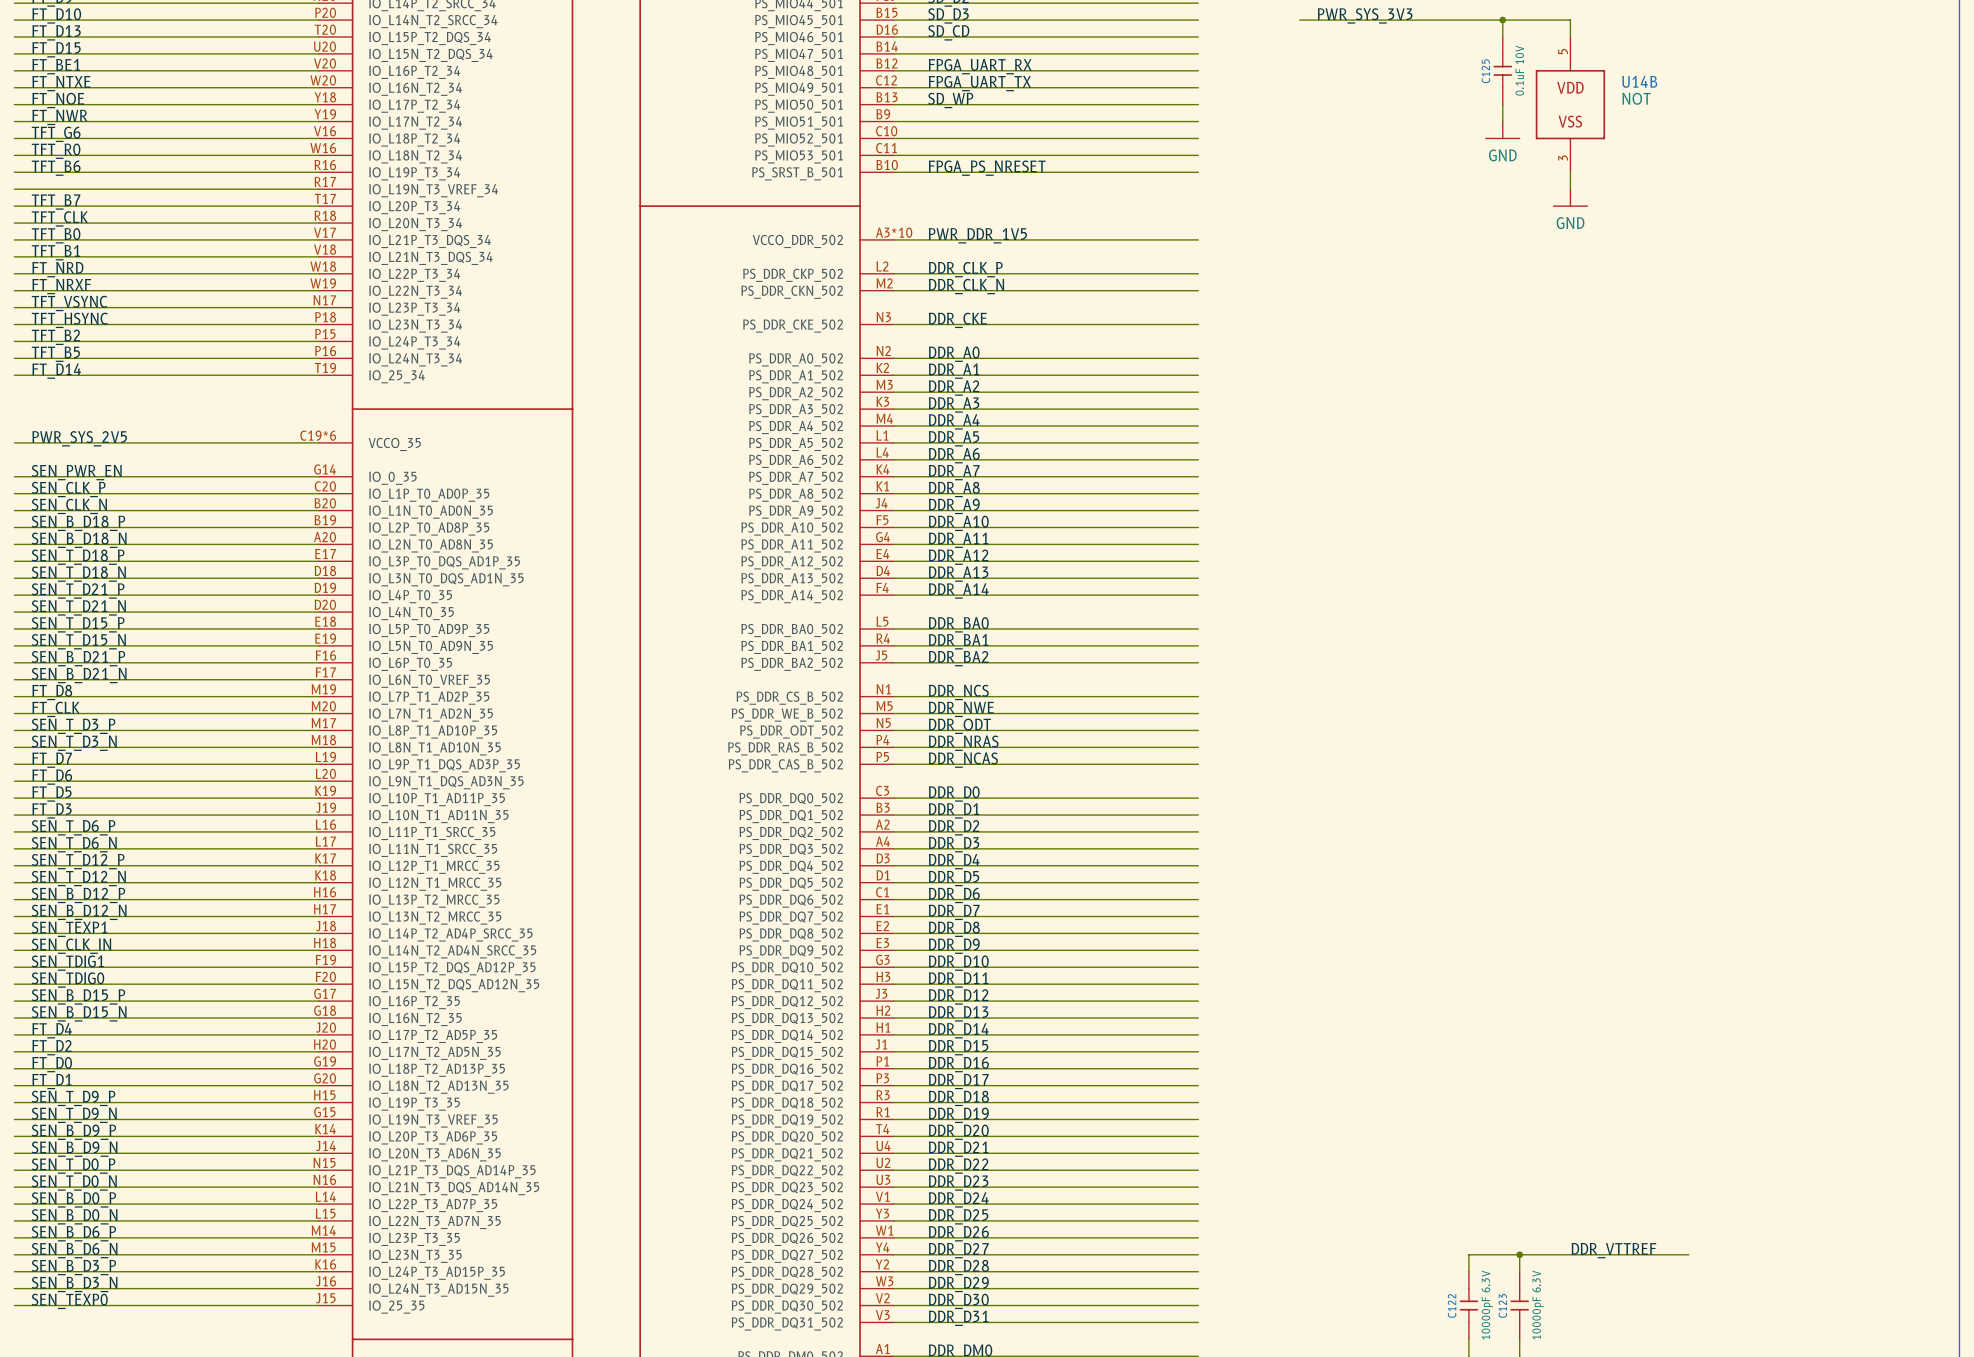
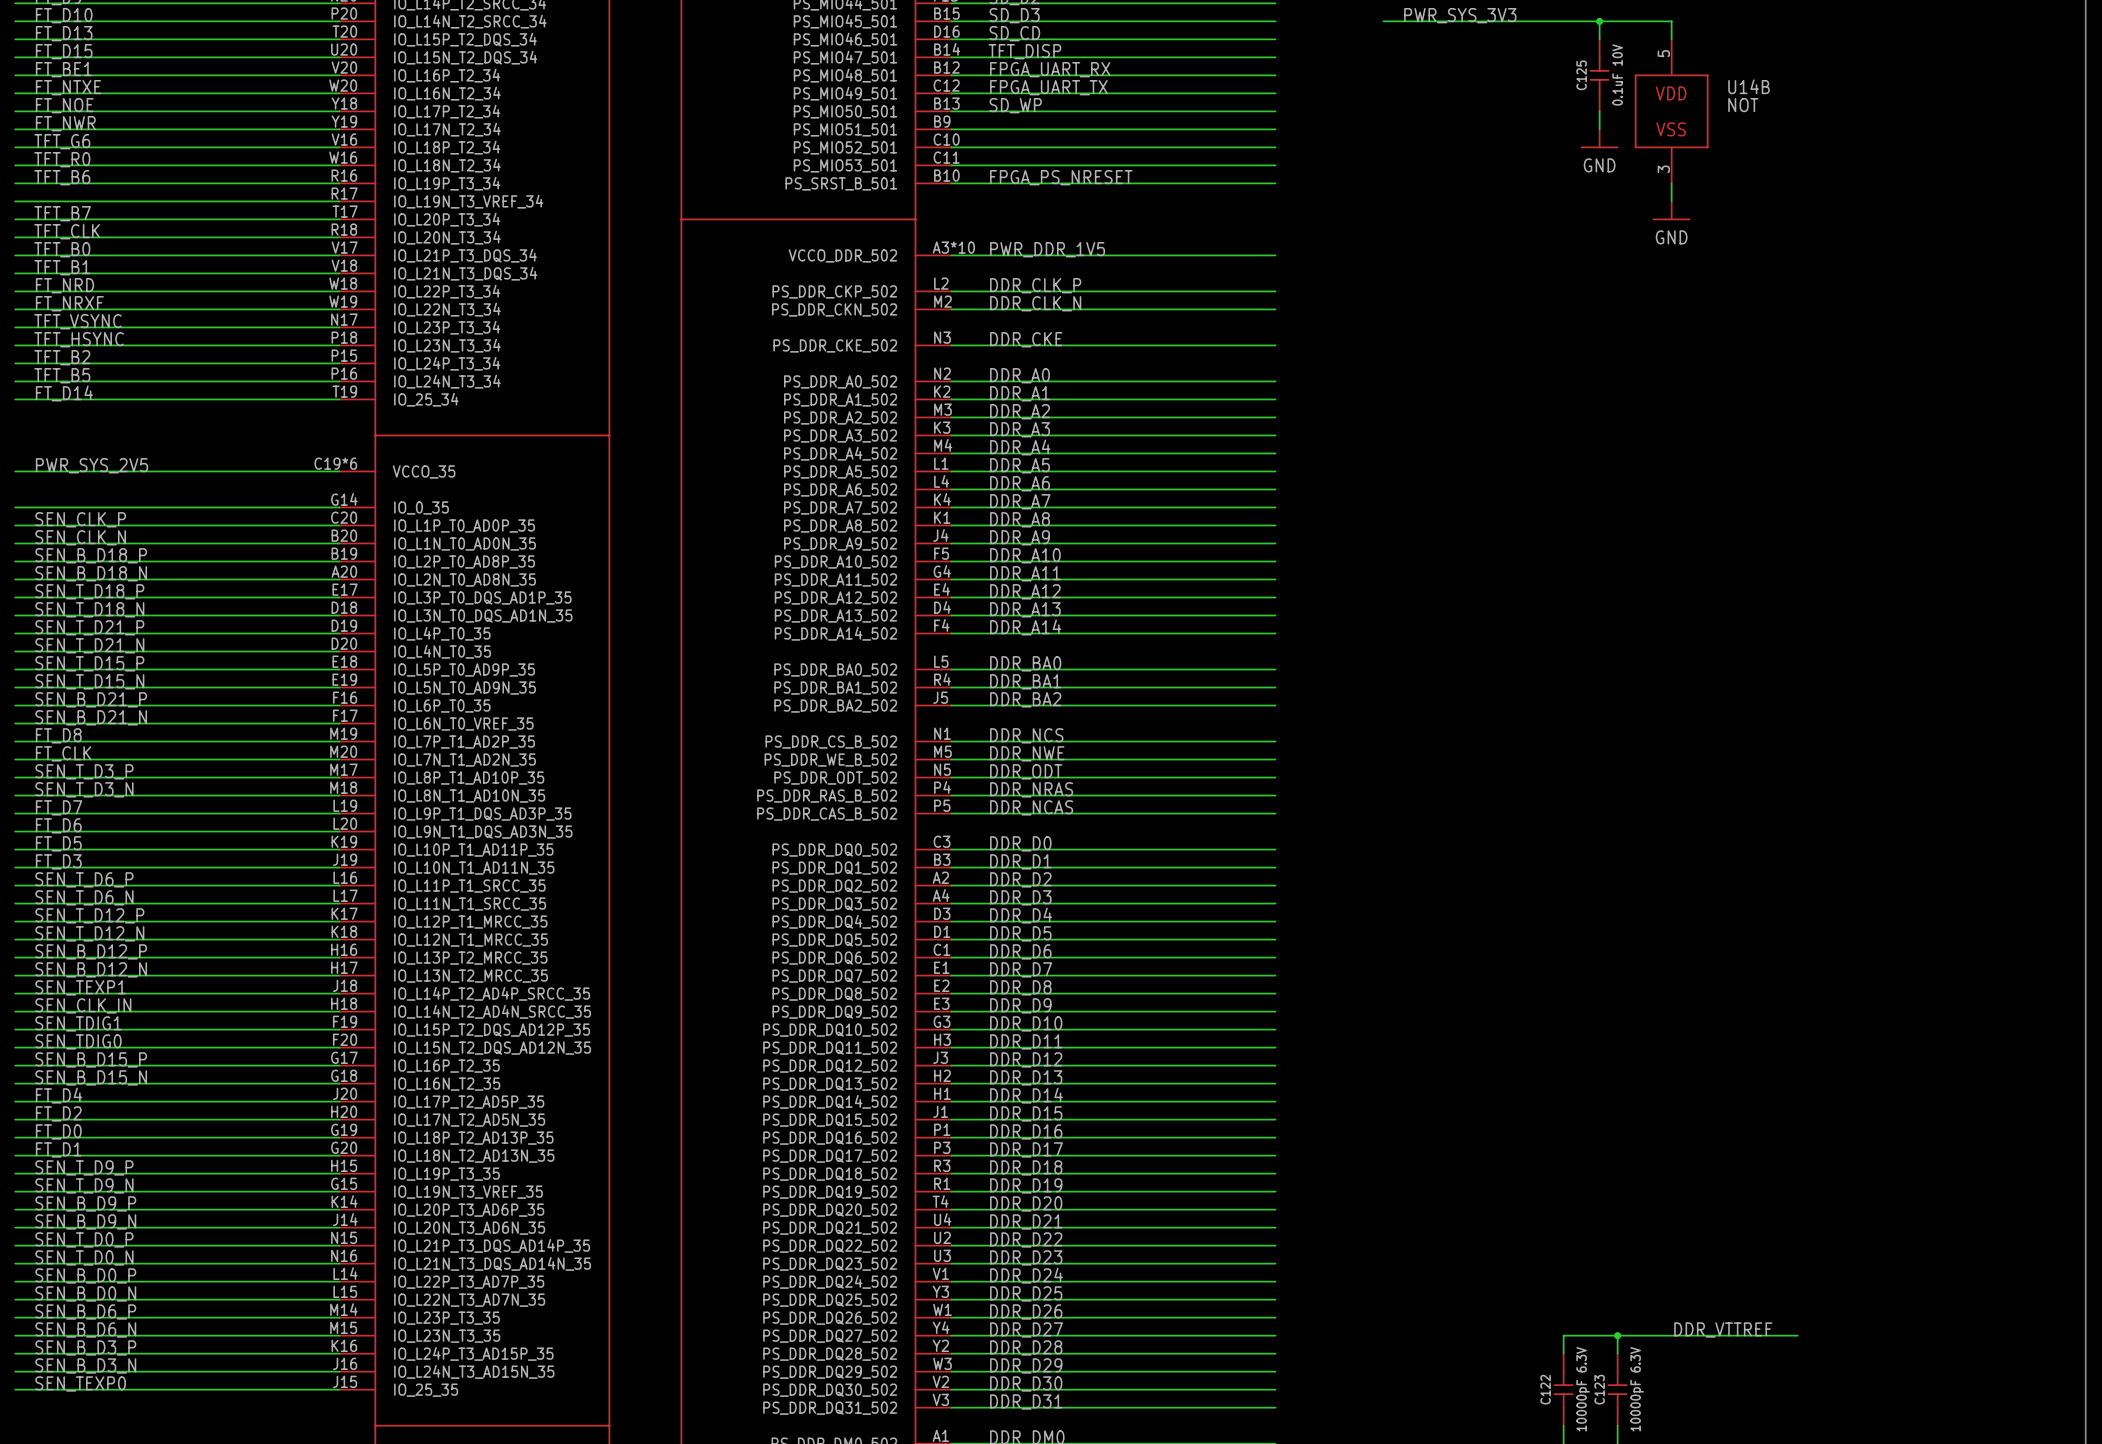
label: none -> TFT_DISP (1024, 51)
label: SEN_PWR_EN (76, 472) -> none

